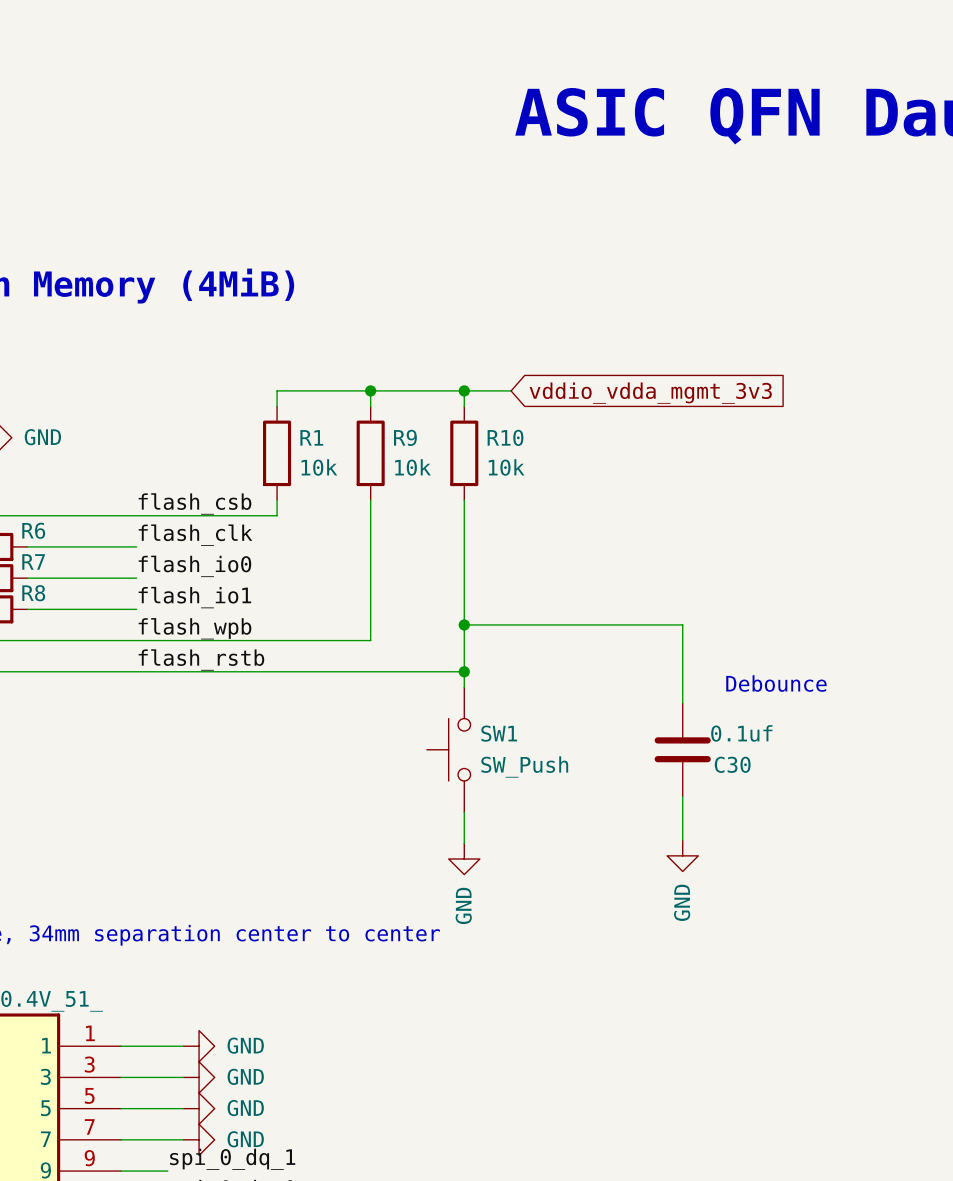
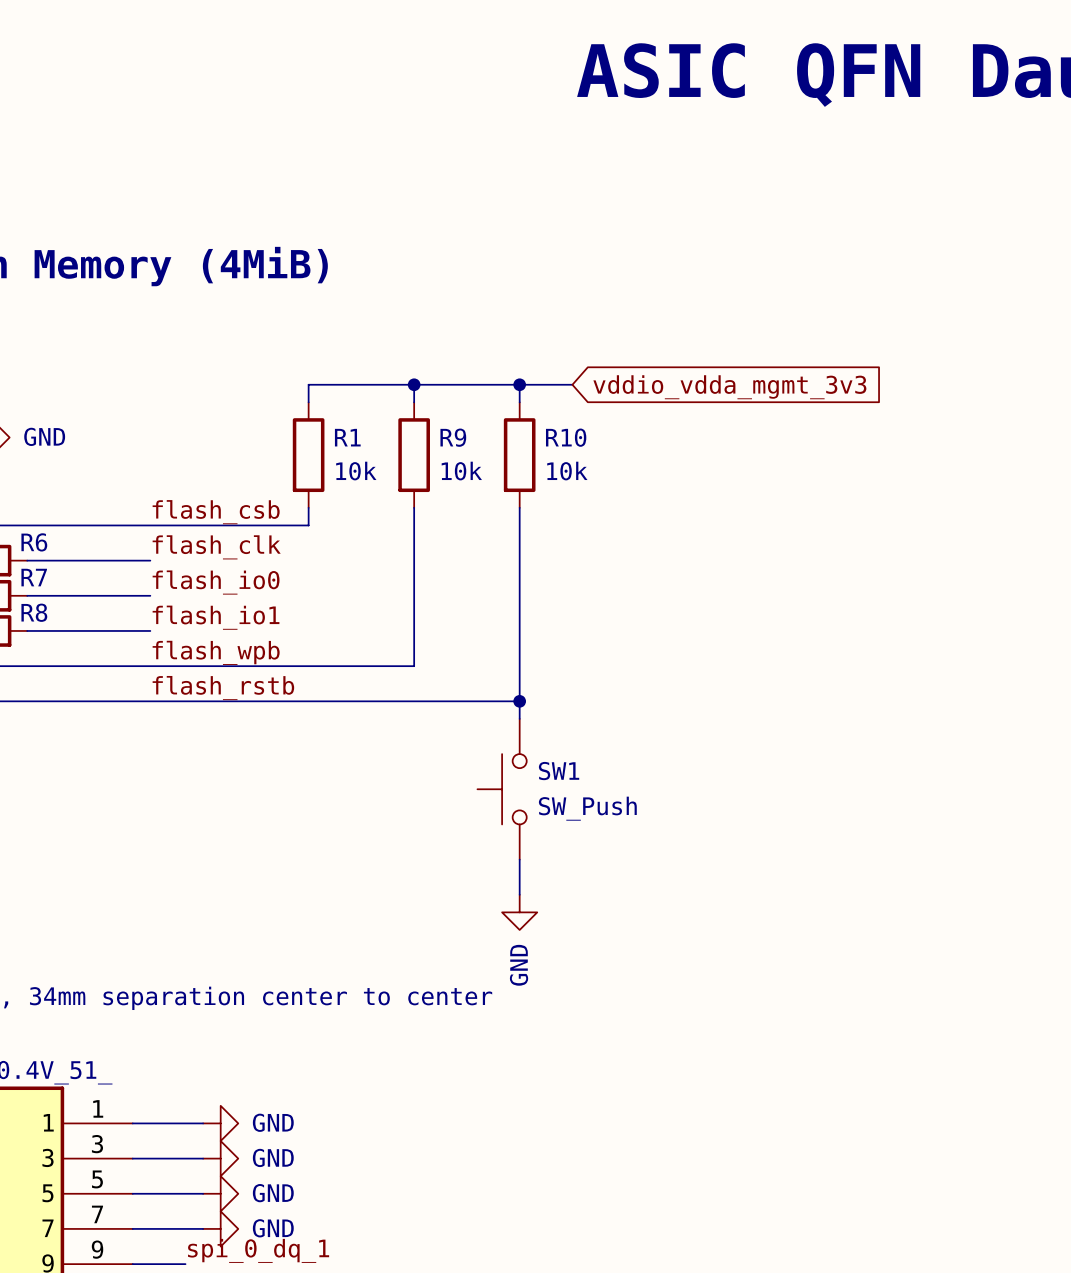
wire: (464, 624) (682, 624) (682, 702) -> none
junction: (464, 624) -> none
text: Debounce (776, 683) -> none
C30: 0.1uf (682, 749) -> none
wire: (682, 796) (682, 840) -> none
power symbol: GND (682, 855) -> none

